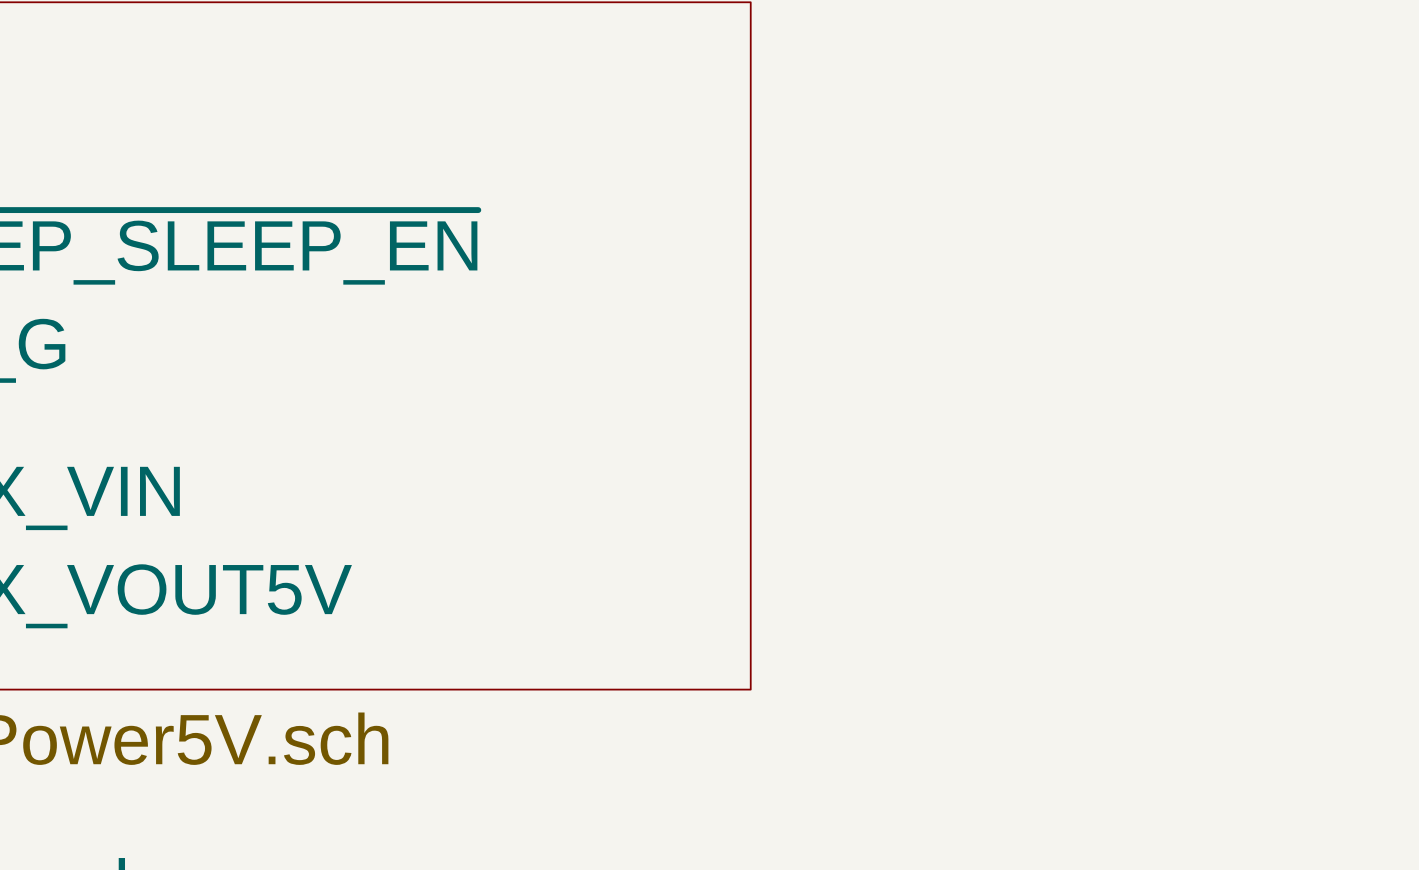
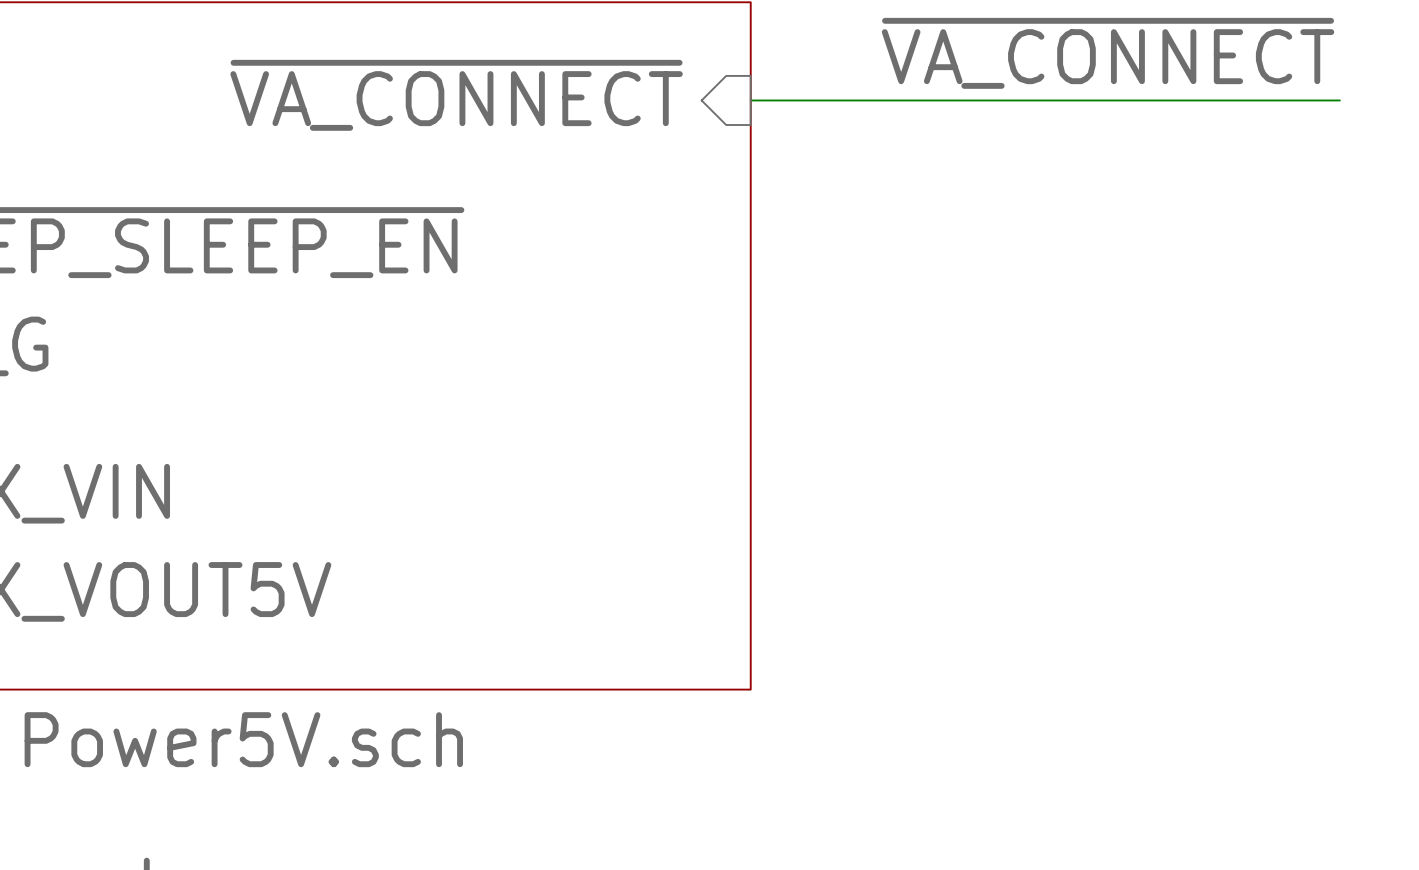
label: none -> ~{VA_CONNECT} (1108, 53)
sheet pin: none -> ~{VA_CONNECT} (456, 95)
wire: none -> (750, 100) (1339, 100)

